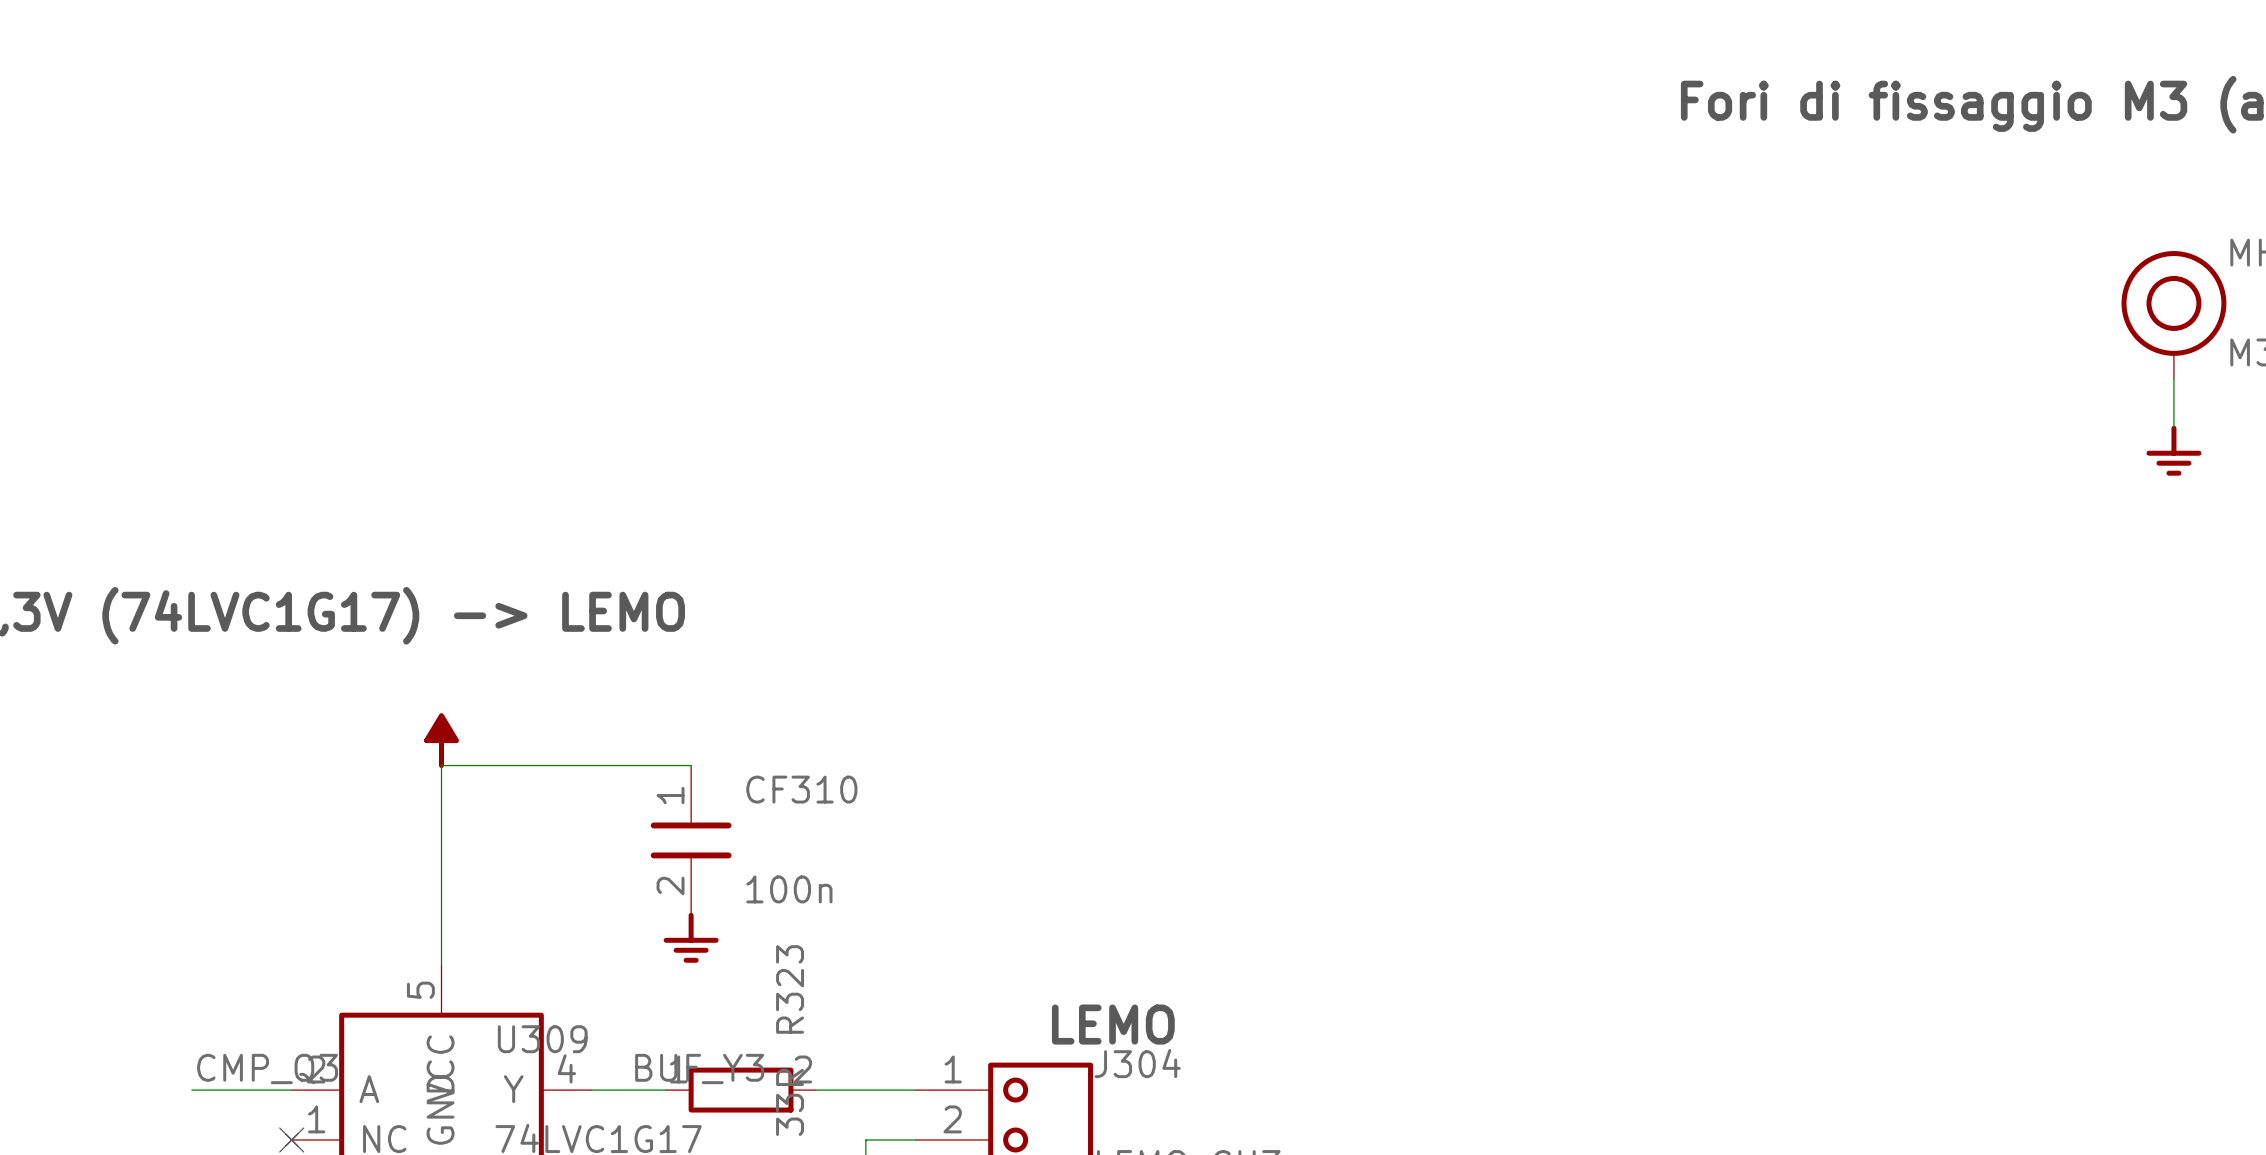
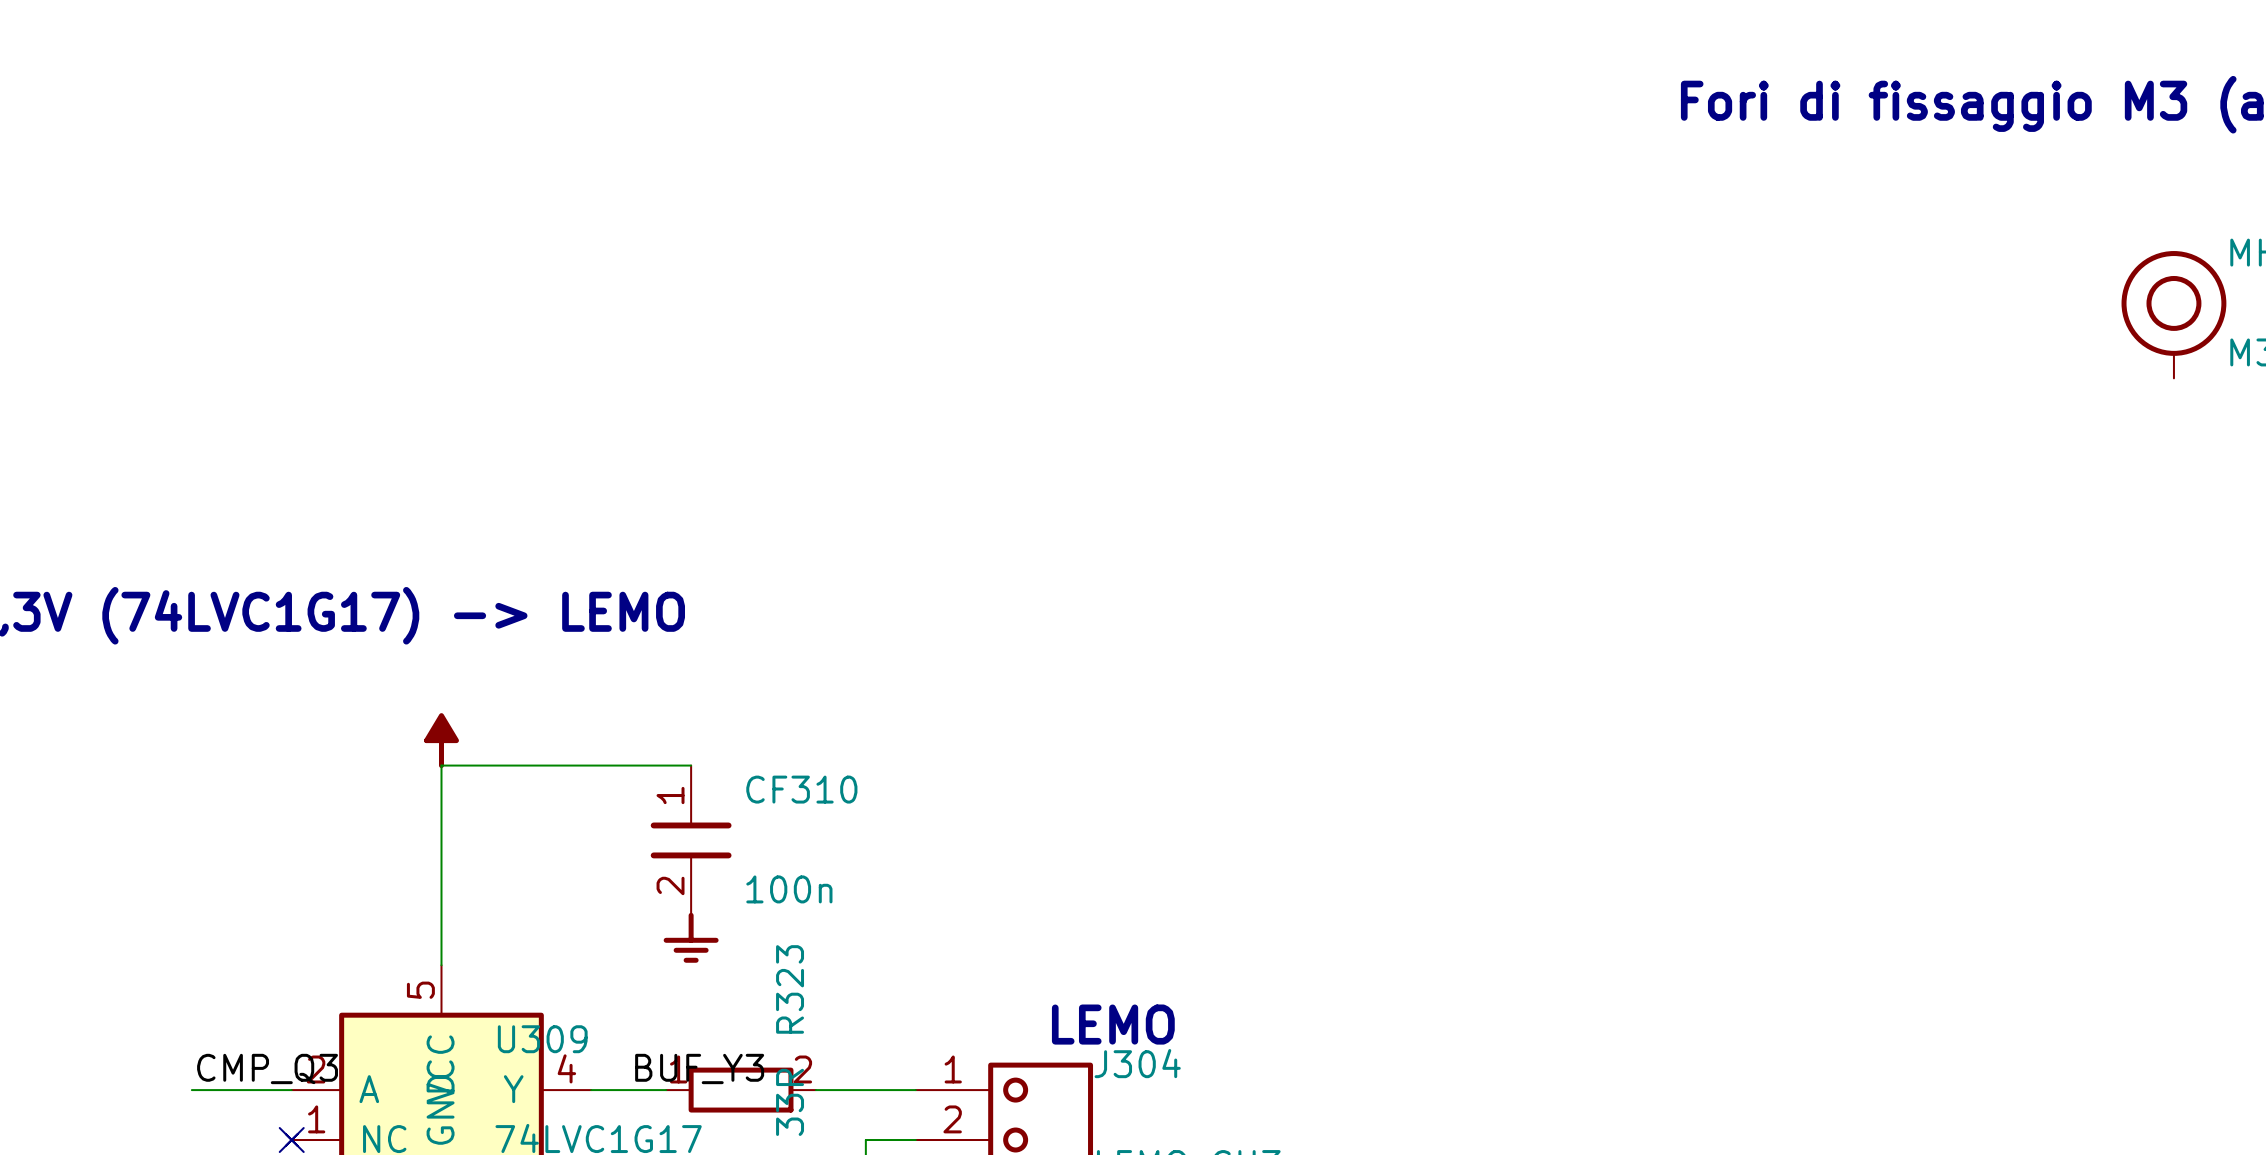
wire: (2173, 378) (2173, 428) -> none
power symbol: (2173, 450) -> none

